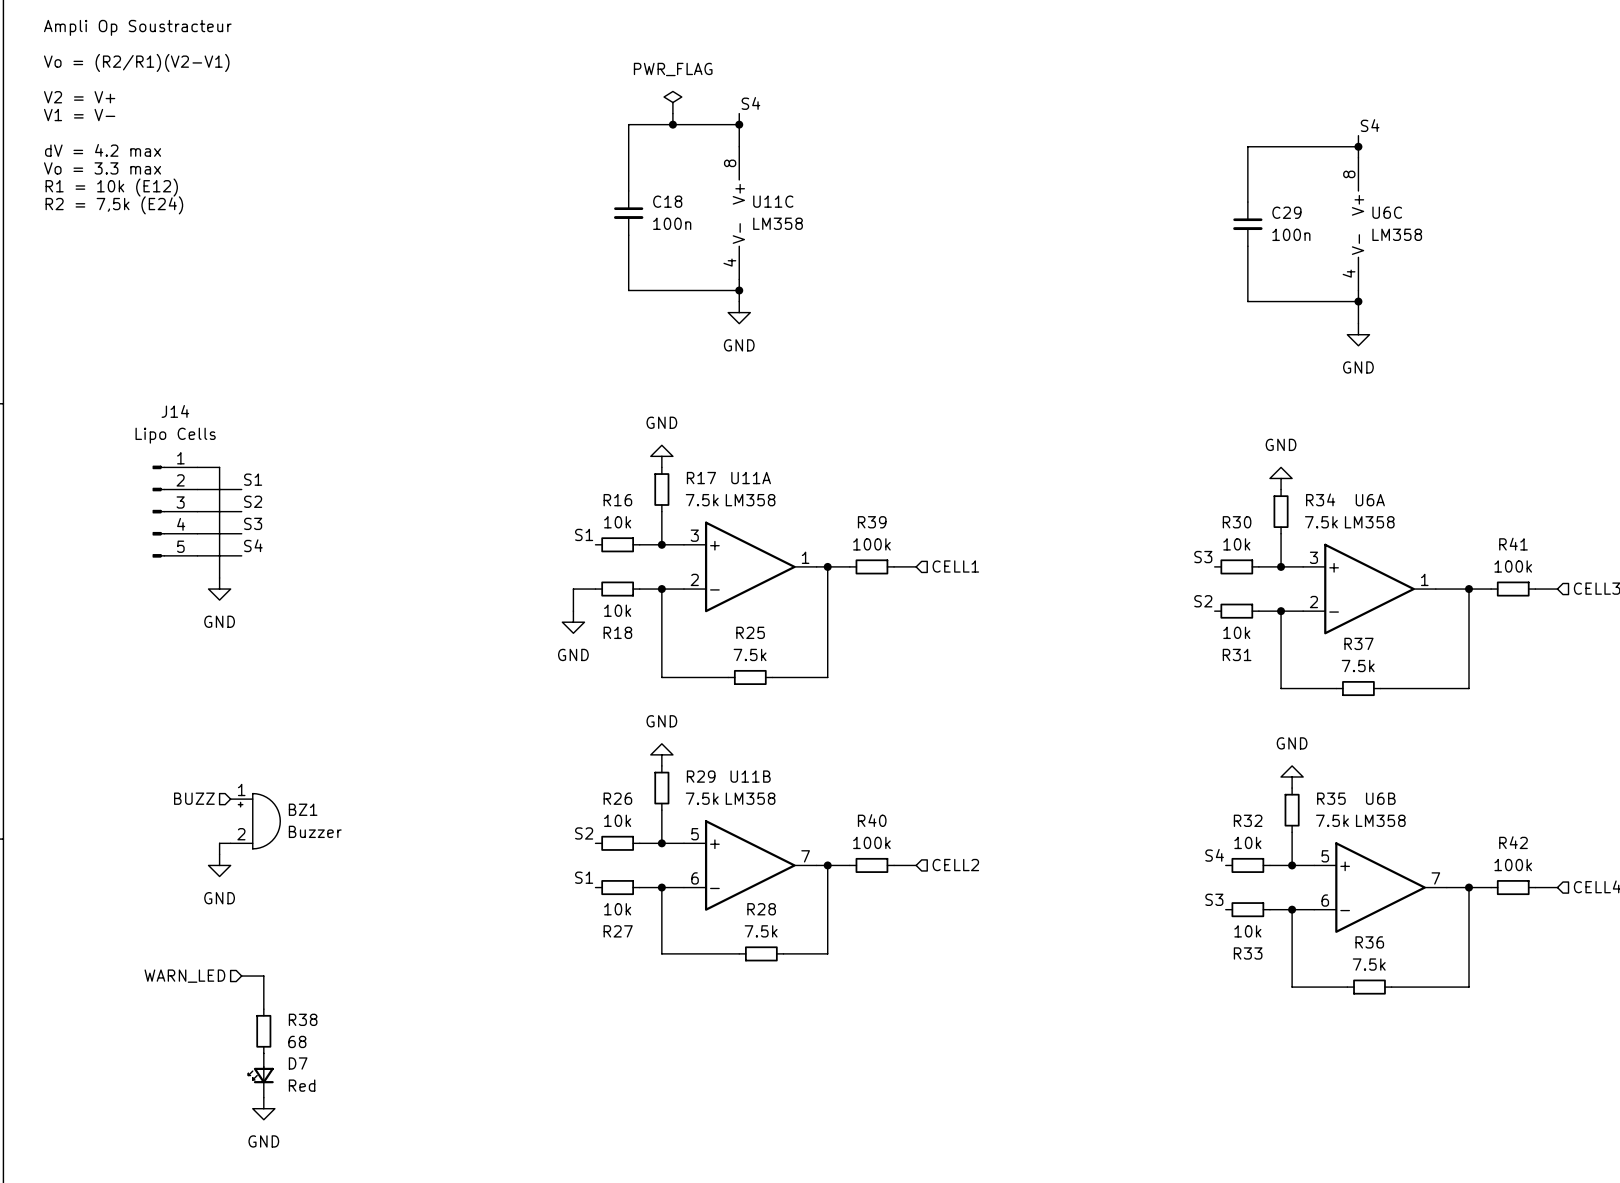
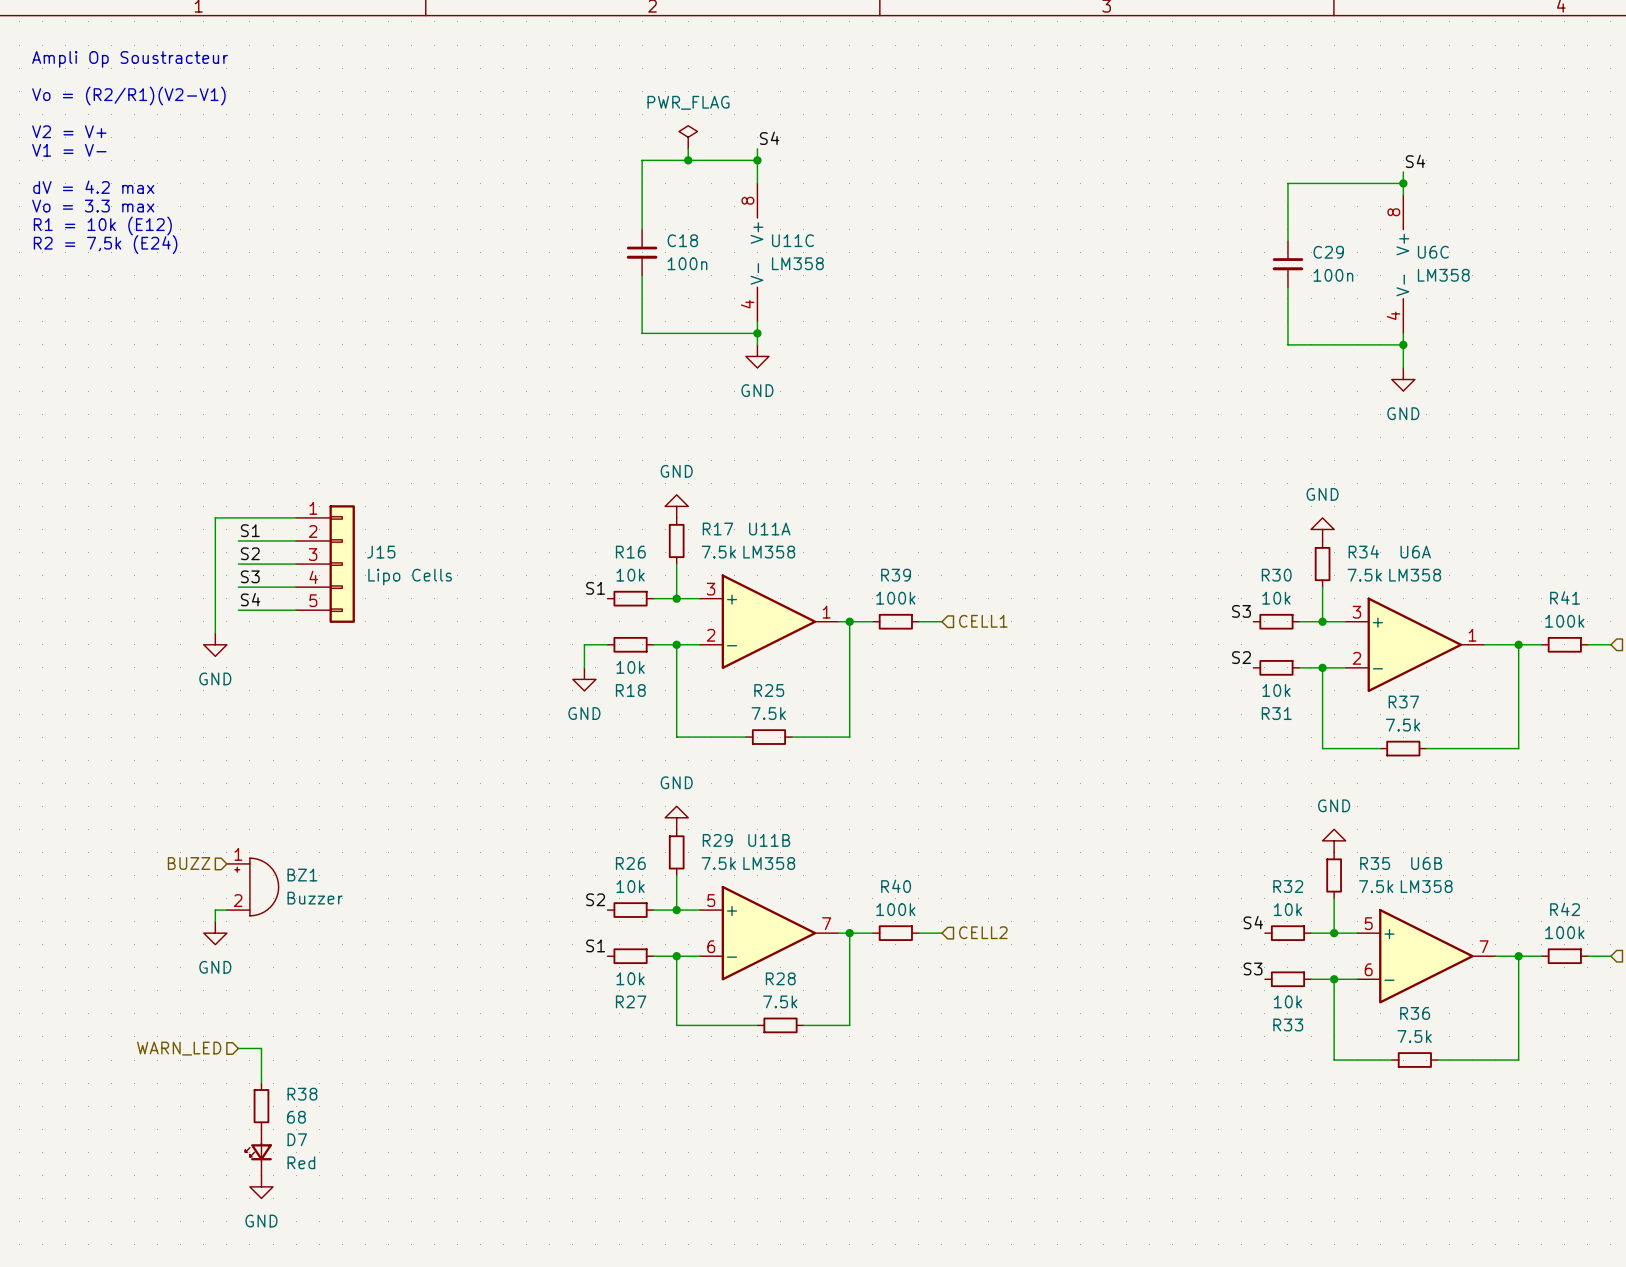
wire: (197, 467) (219, 467) -> (296, 517) (215, 517)
wire: (197, 489) (241, 489) -> (296, 540) (238, 540)
J14: Lipo Cells (175, 511) -> none
wire: (197, 511) (241, 511) -> (296, 564) (238, 564)
J15: none -> Lipo Cells (325, 564)
wire: (197, 533) (241, 533) -> (296, 587) (238, 587)
wire: (197, 555) (241, 555) -> (296, 610) (238, 610)

